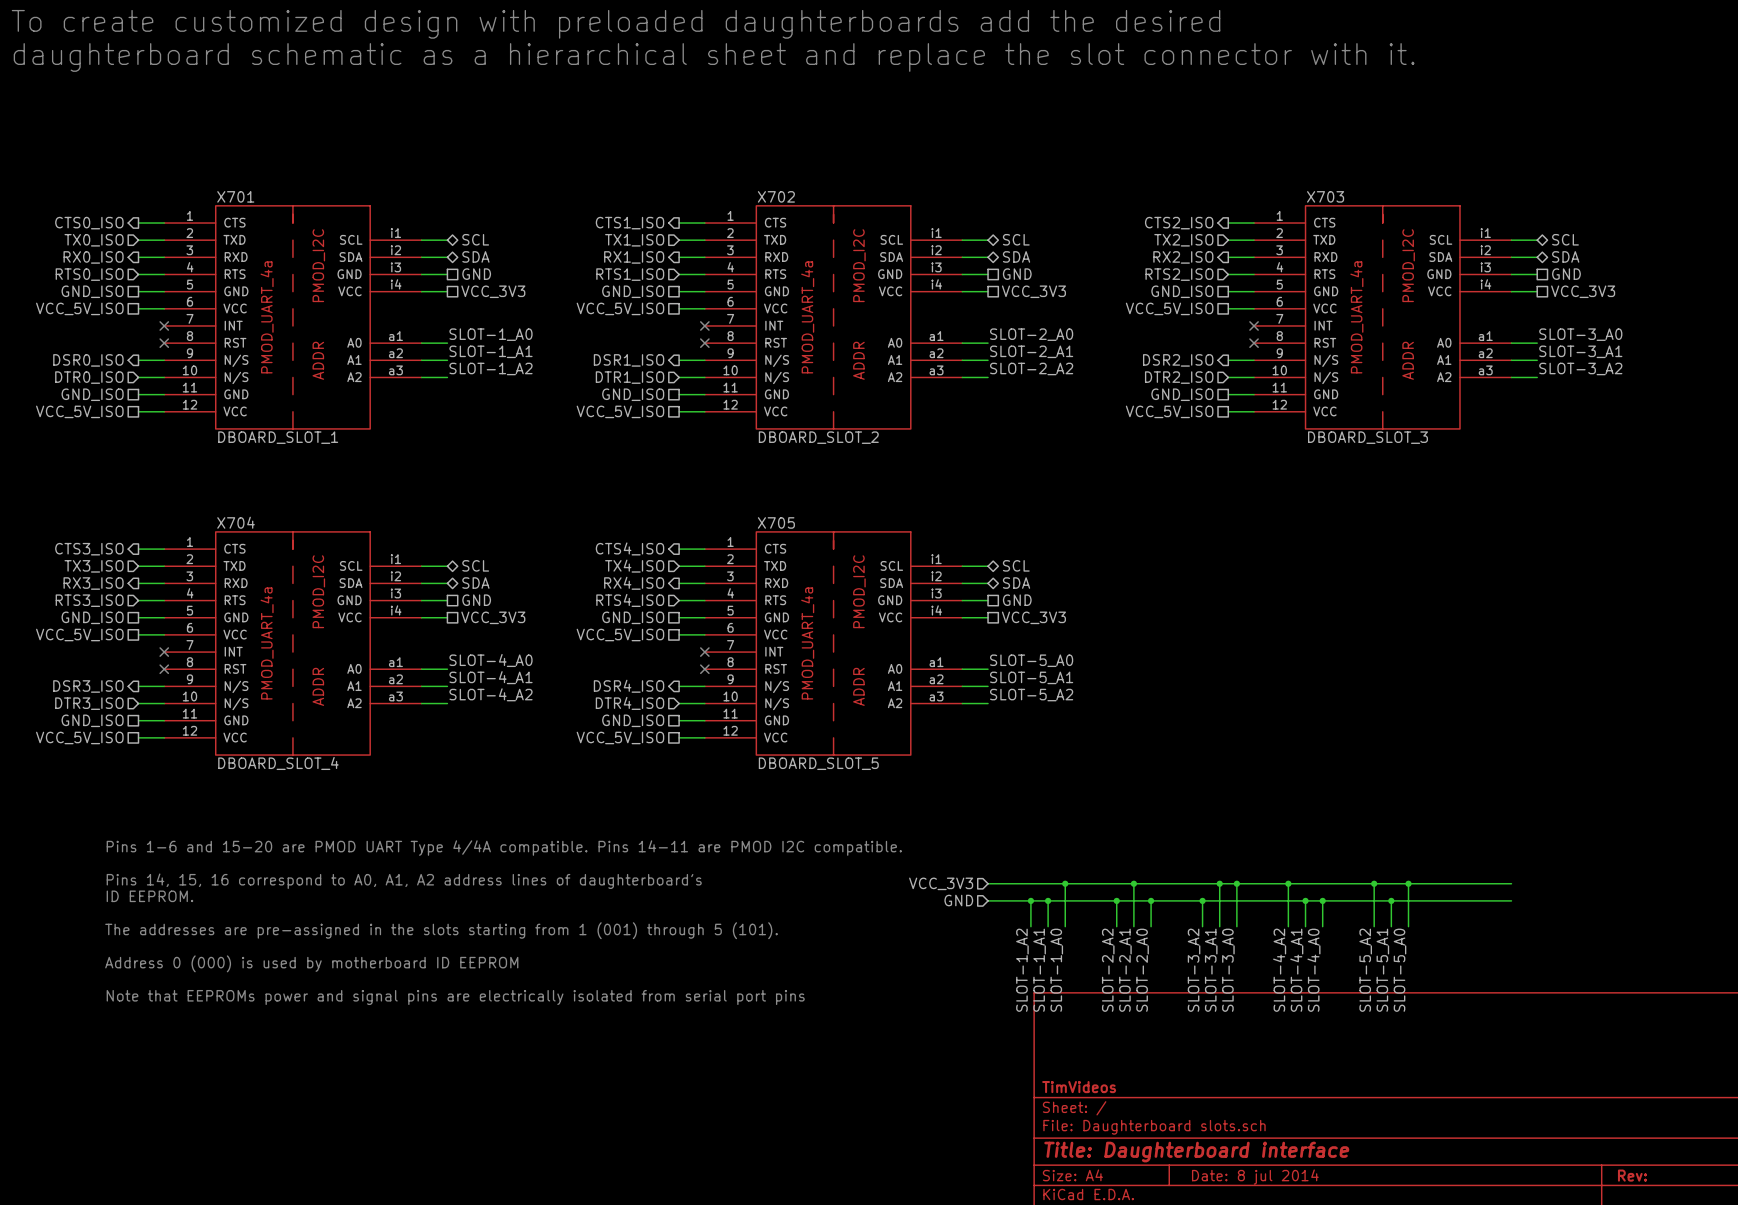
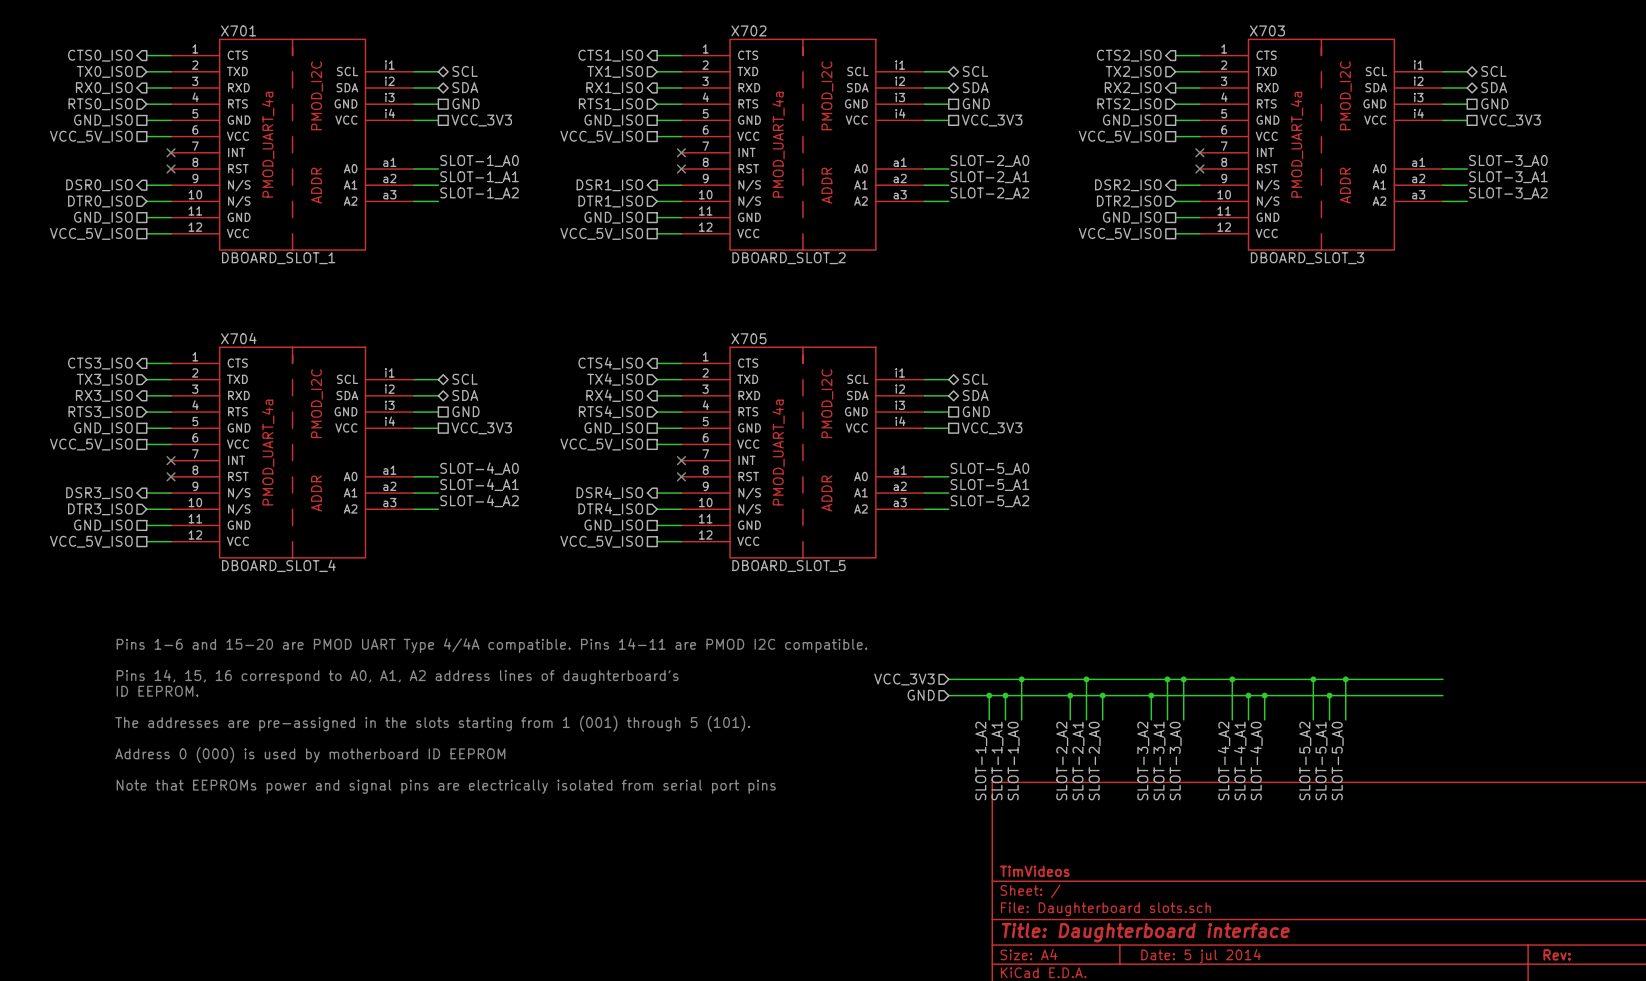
title block: Date: 8 jul 2014 (1255, 1177) -> Date: 5 jul 2014 (1201, 956)

